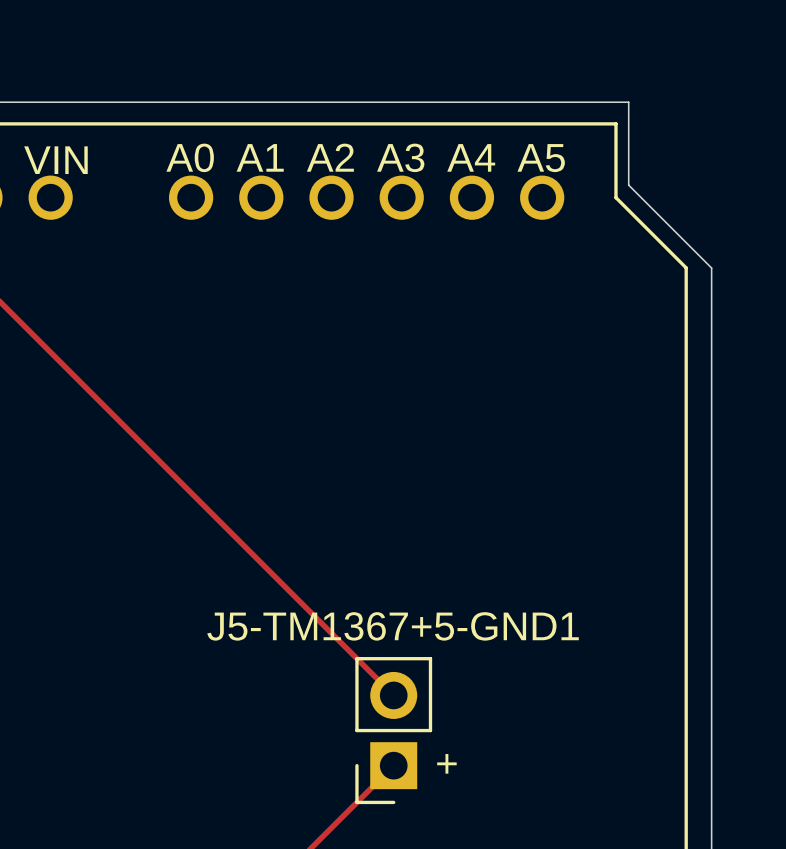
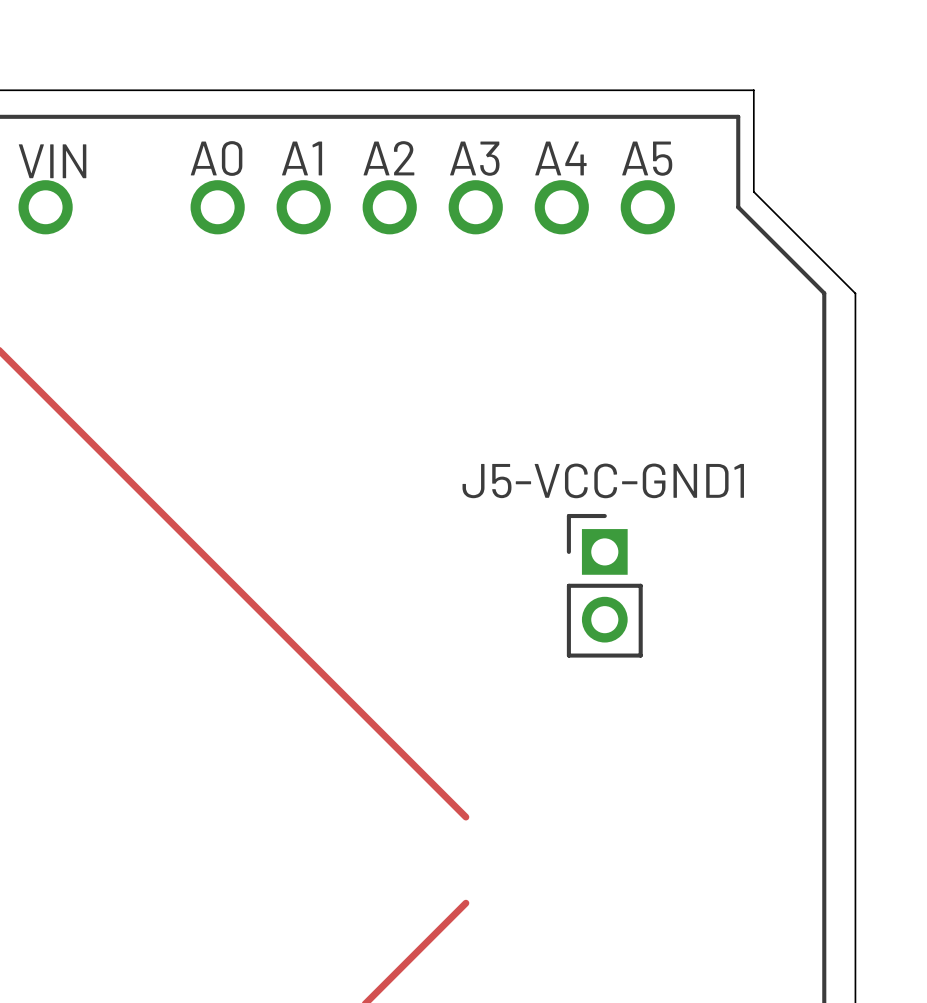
J5-VCC-GND1: none -> (604, 585)
J5-TM1367+5-GND1: (393, 730) -> none
text: + (446, 763) -> none

